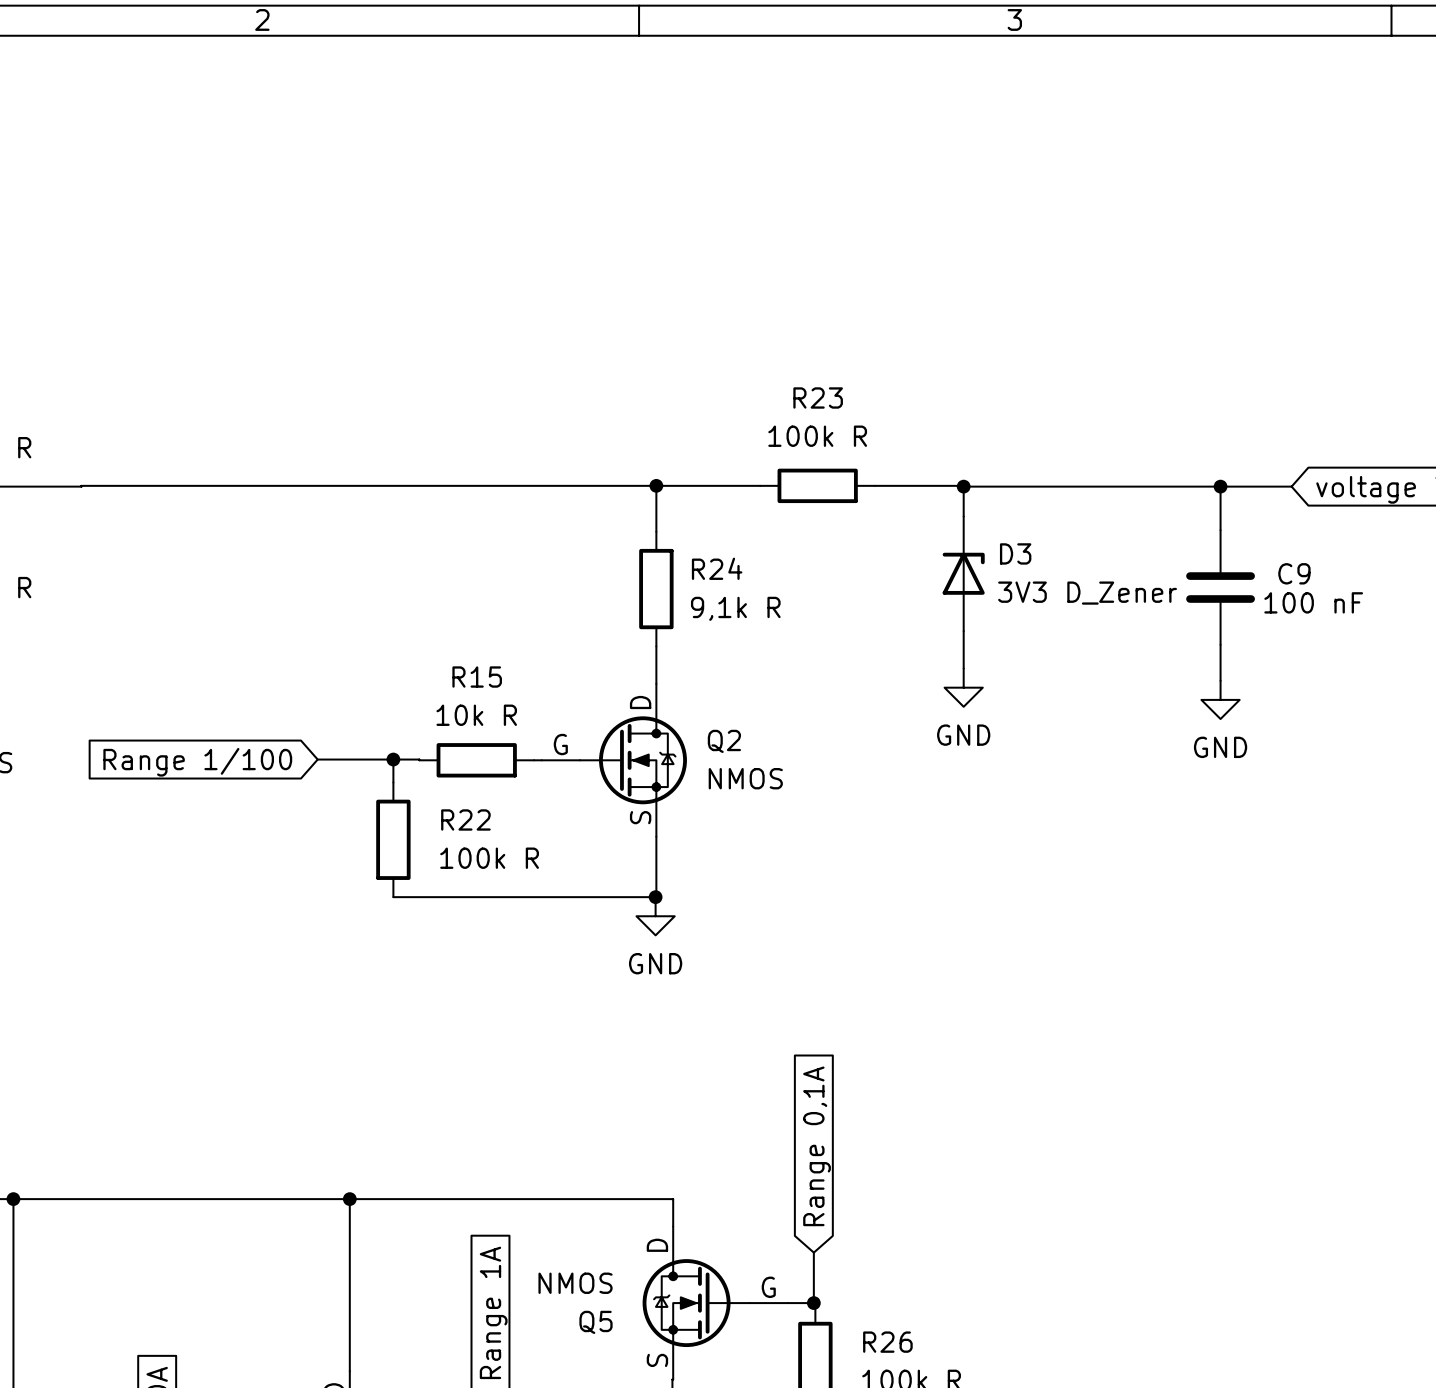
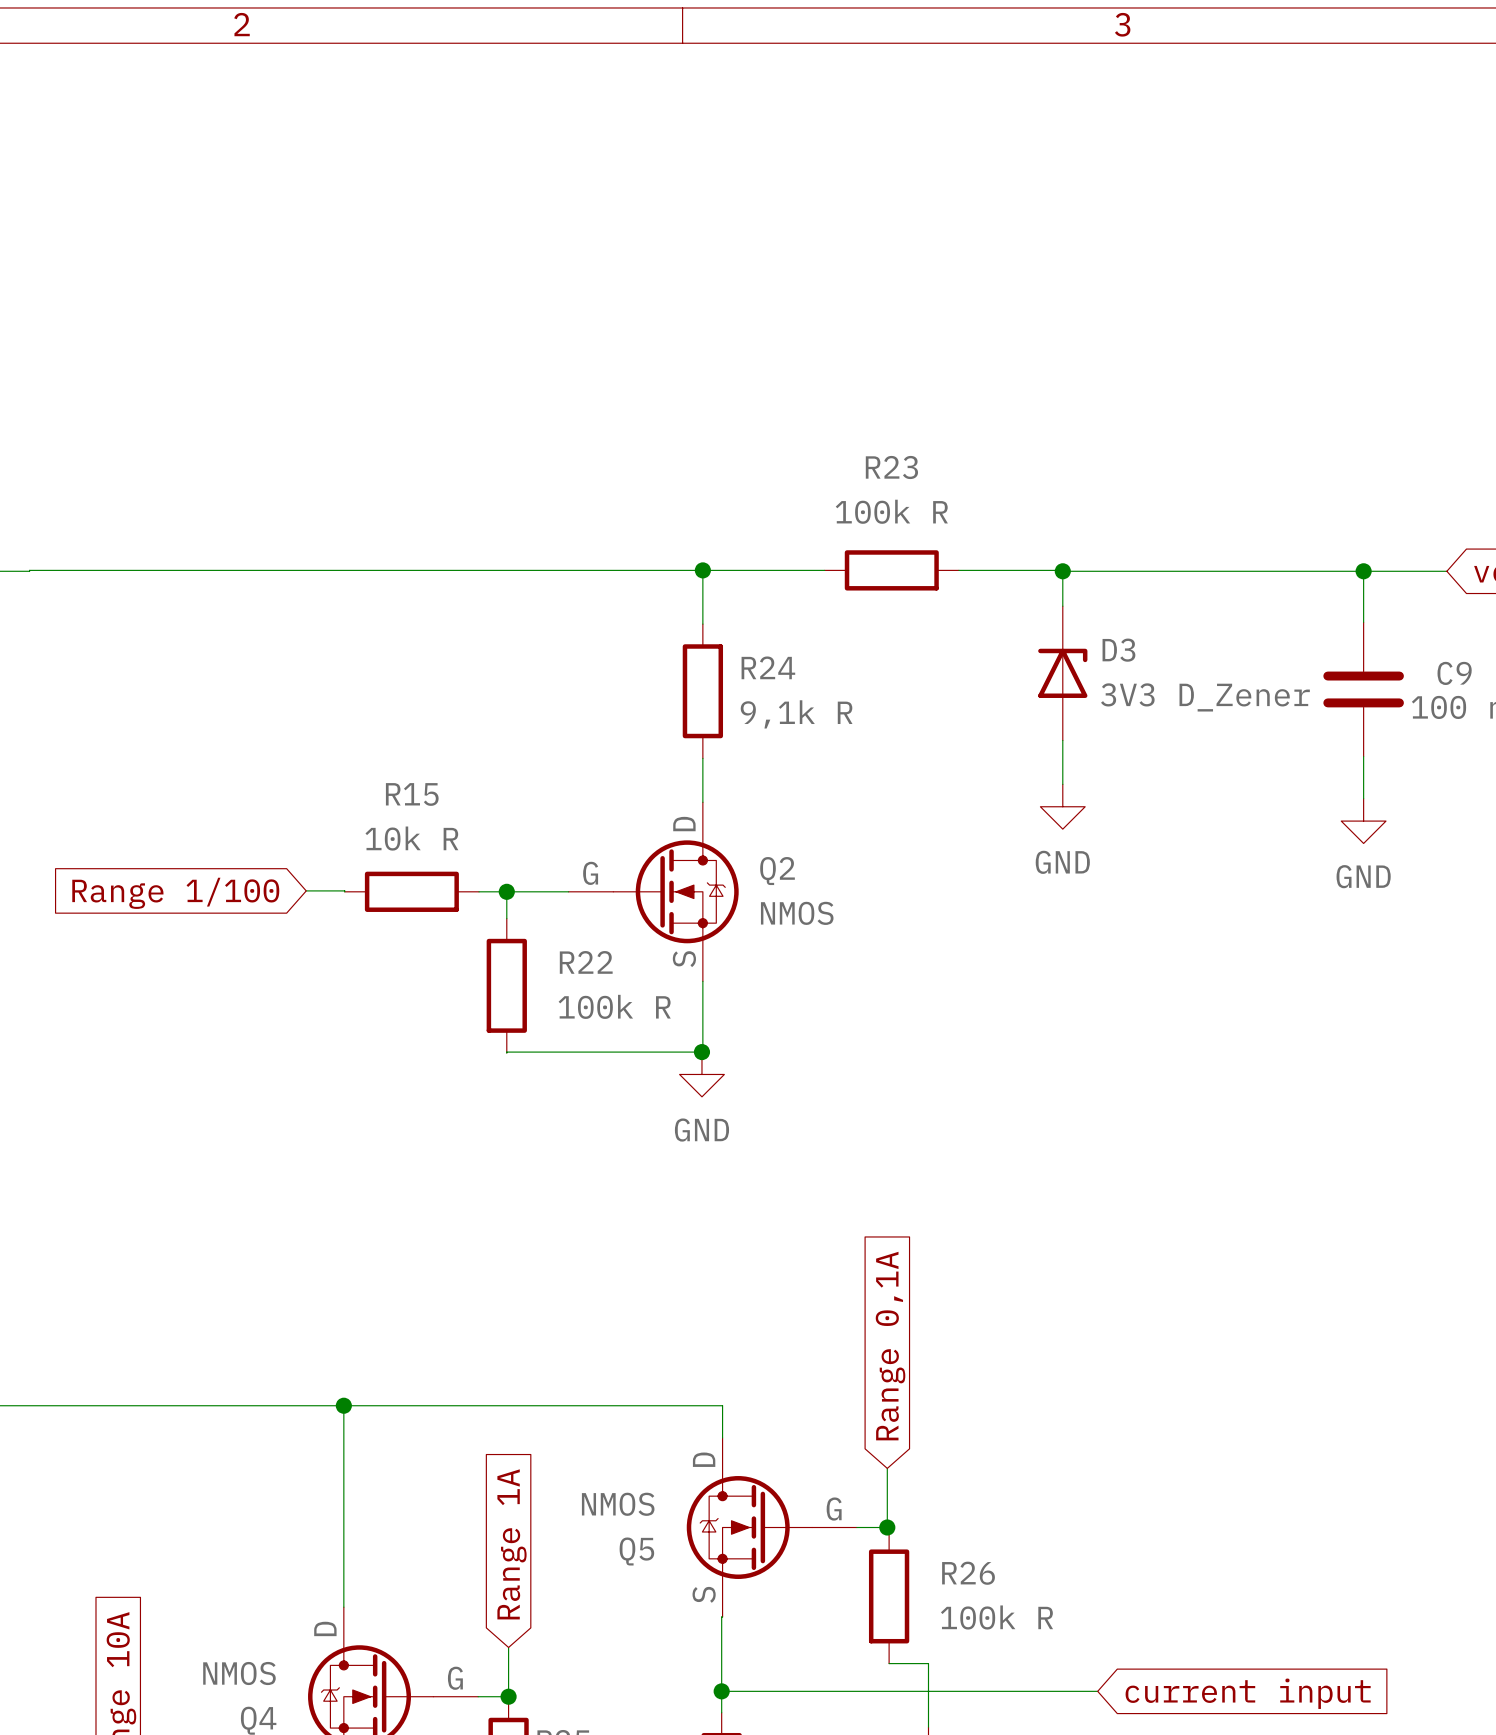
wire: (350, 759) (419, 760) -> (344, 890) (344, 891)
wire: (393, 759) (393, 782) -> (506, 891) (506, 918)
junction: (393, 759) -> none
wire: none -> (479, 891) (559, 891)
R15 position: (476, 760) -> (411, 891)
junction: none -> (506, 891)
R22 position: (393, 839) -> (506, 985)
wire: (393, 897) (488, 897) -> (506, 1052) (506, 1052)

